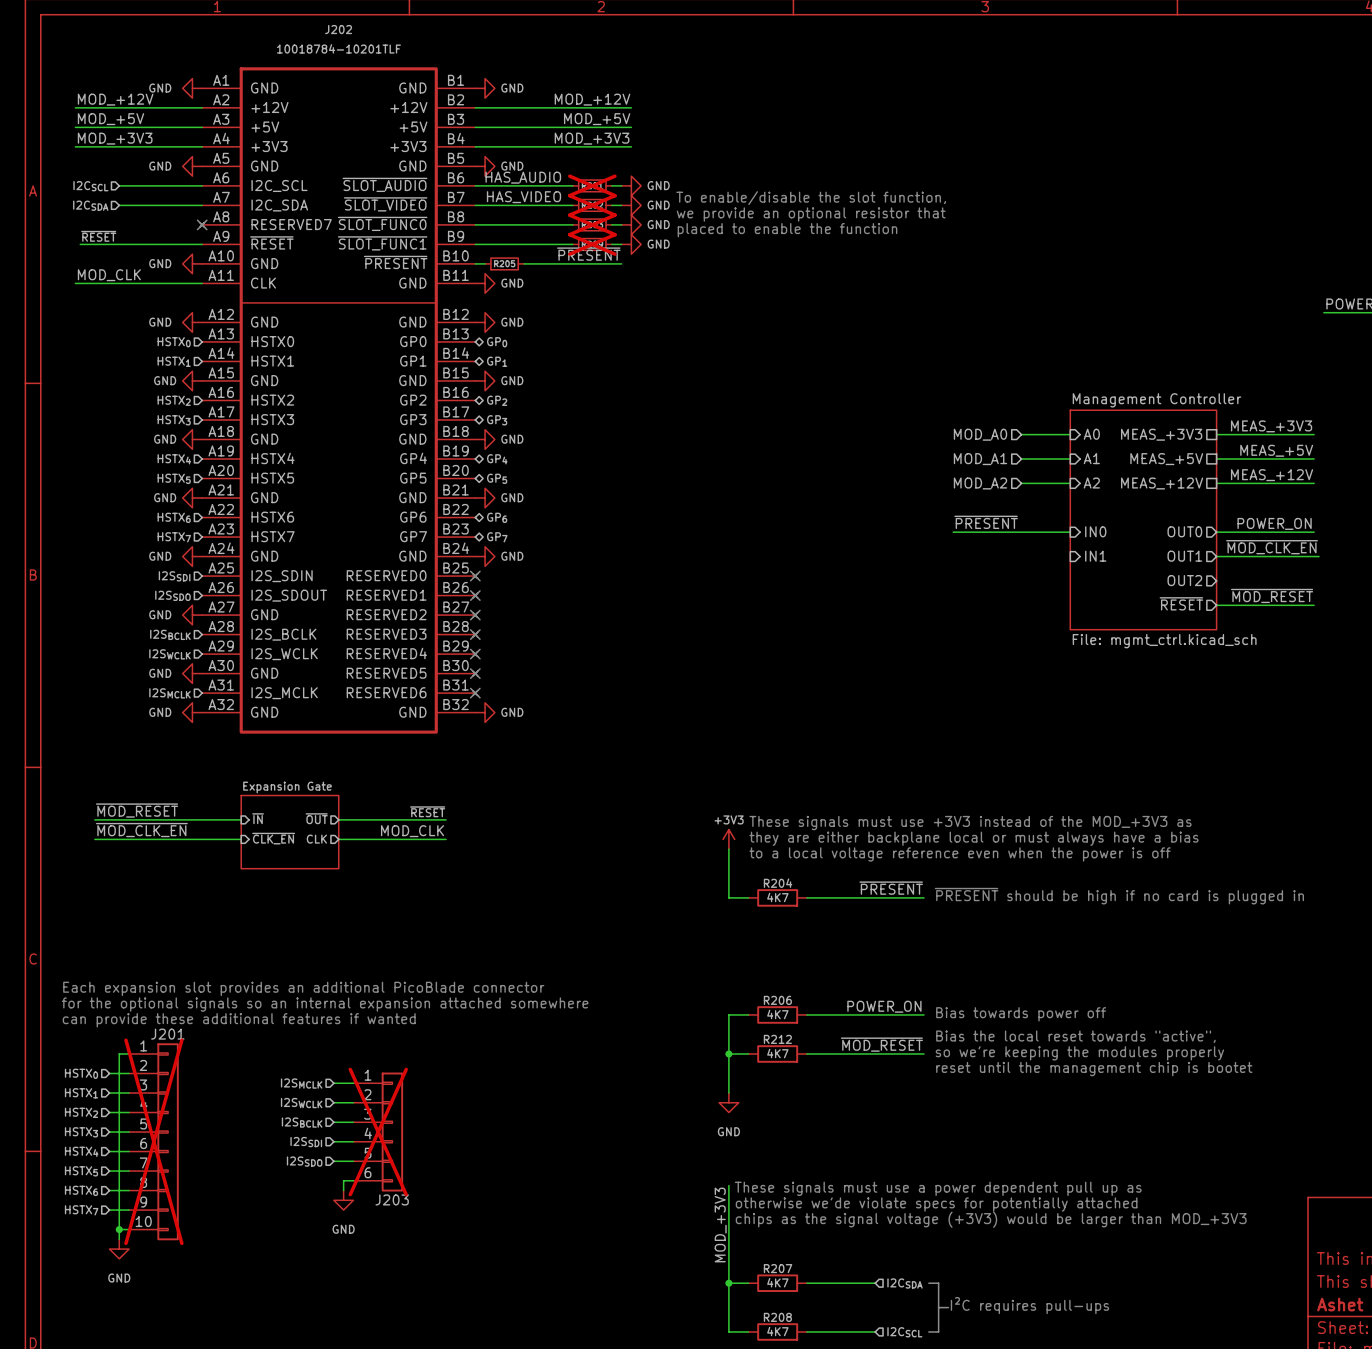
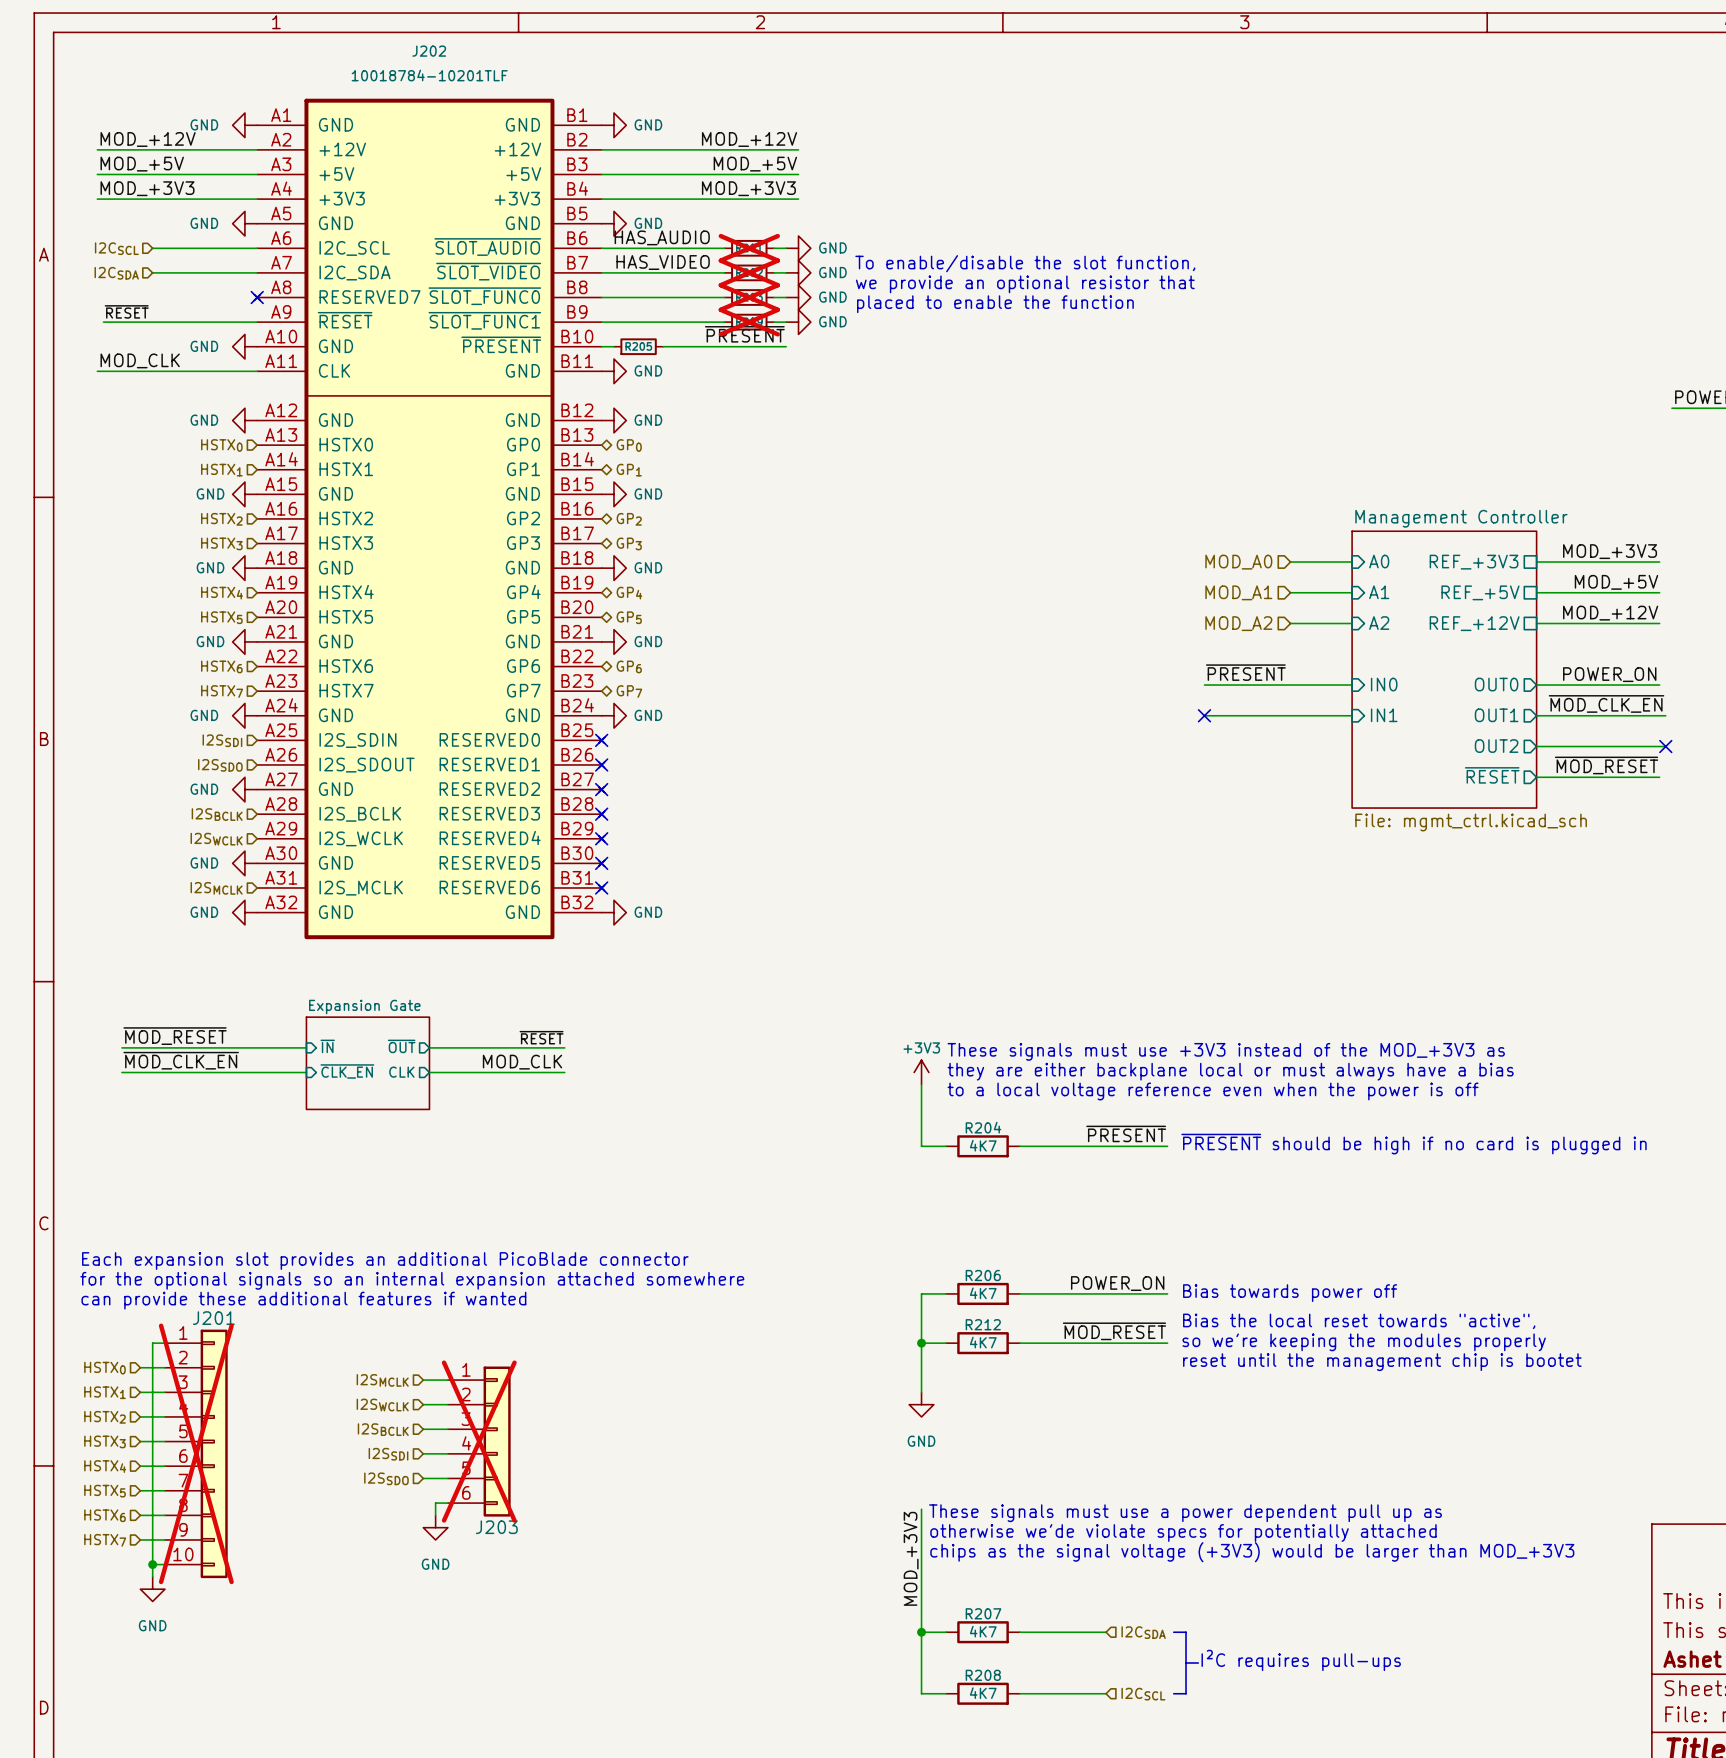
label: MEAS_+3V3 (1271, 426) -> MOD_+3V3 (1610, 551)
sheet pin: MEAS_+3V3 (1161, 434) -> REF_+3V3 (1474, 562)
label: MEAS_+5V (1276, 450) -> MOD_+5V (1616, 582)
sheet pin: MEAS_+5V (1166, 459) -> REF_+5V (1480, 592)
label: MEAS_+12V (1272, 475) -> MOD_+12V (1610, 613)
sheet pin: MEAS_+12V (1162, 483) -> REF_+12V (1474, 623)
wire: none -> (1204, 715) (1352, 715)
no-connect mark: none -> (1204, 715)
wire: none -> (1536, 746) (1665, 746)
no-connect mark: none -> (1665, 746)

